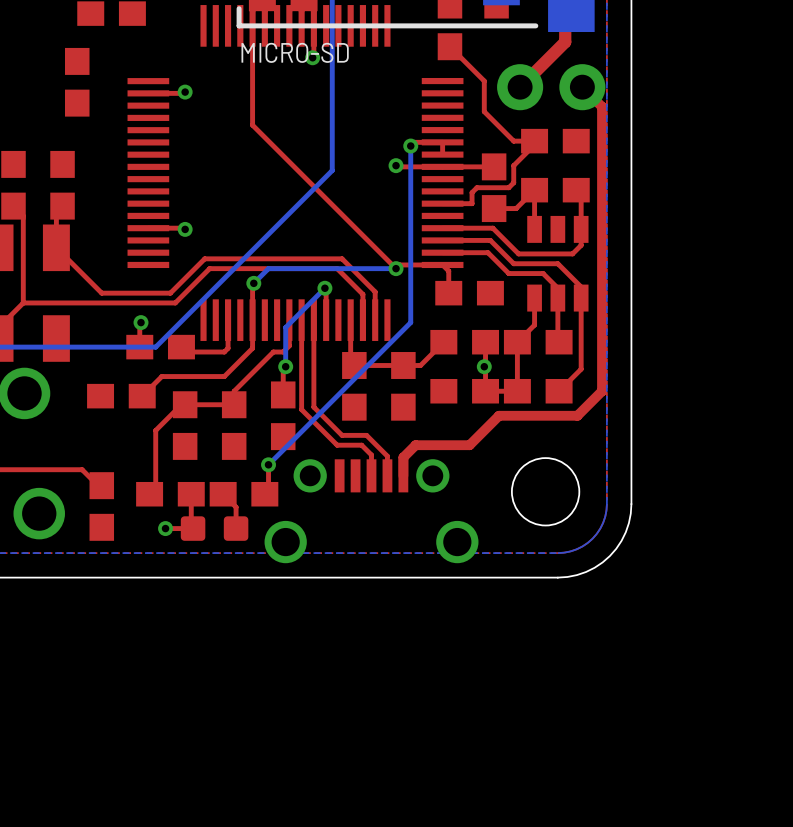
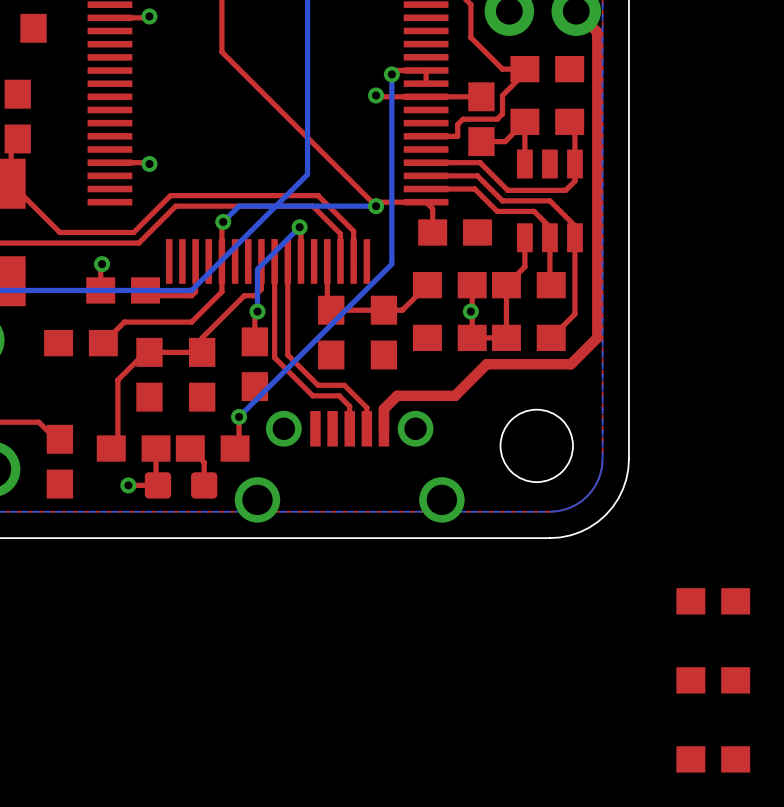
bottom track: (332, 170) (155, 347) -> (307, 100) (307, 174) (191, 290) (117, 290)
part: none -> (713, 601)
part: none -> (713, 680)
part: none -> (713, 759)

